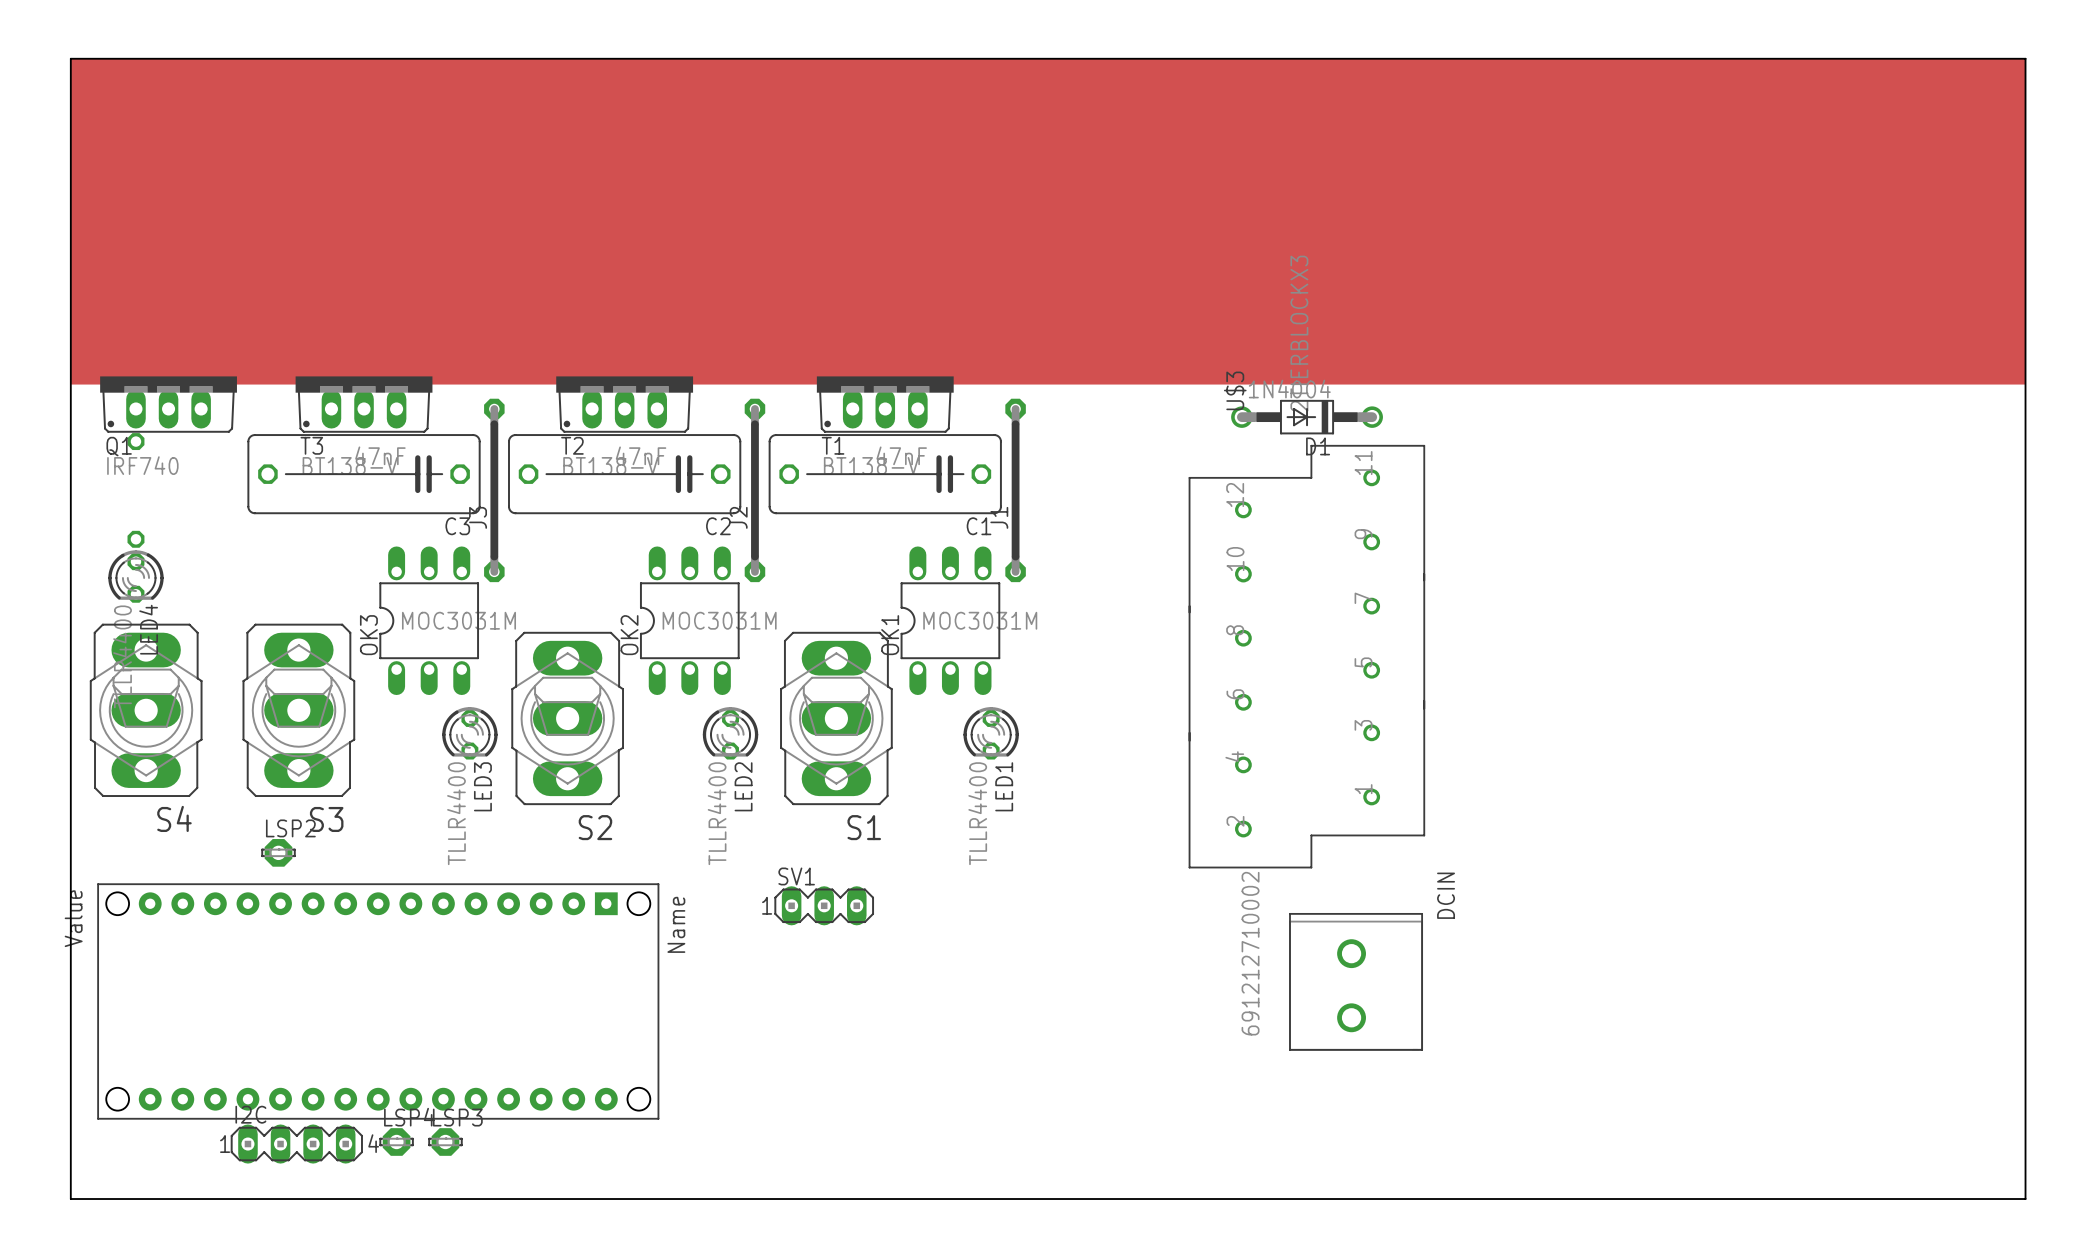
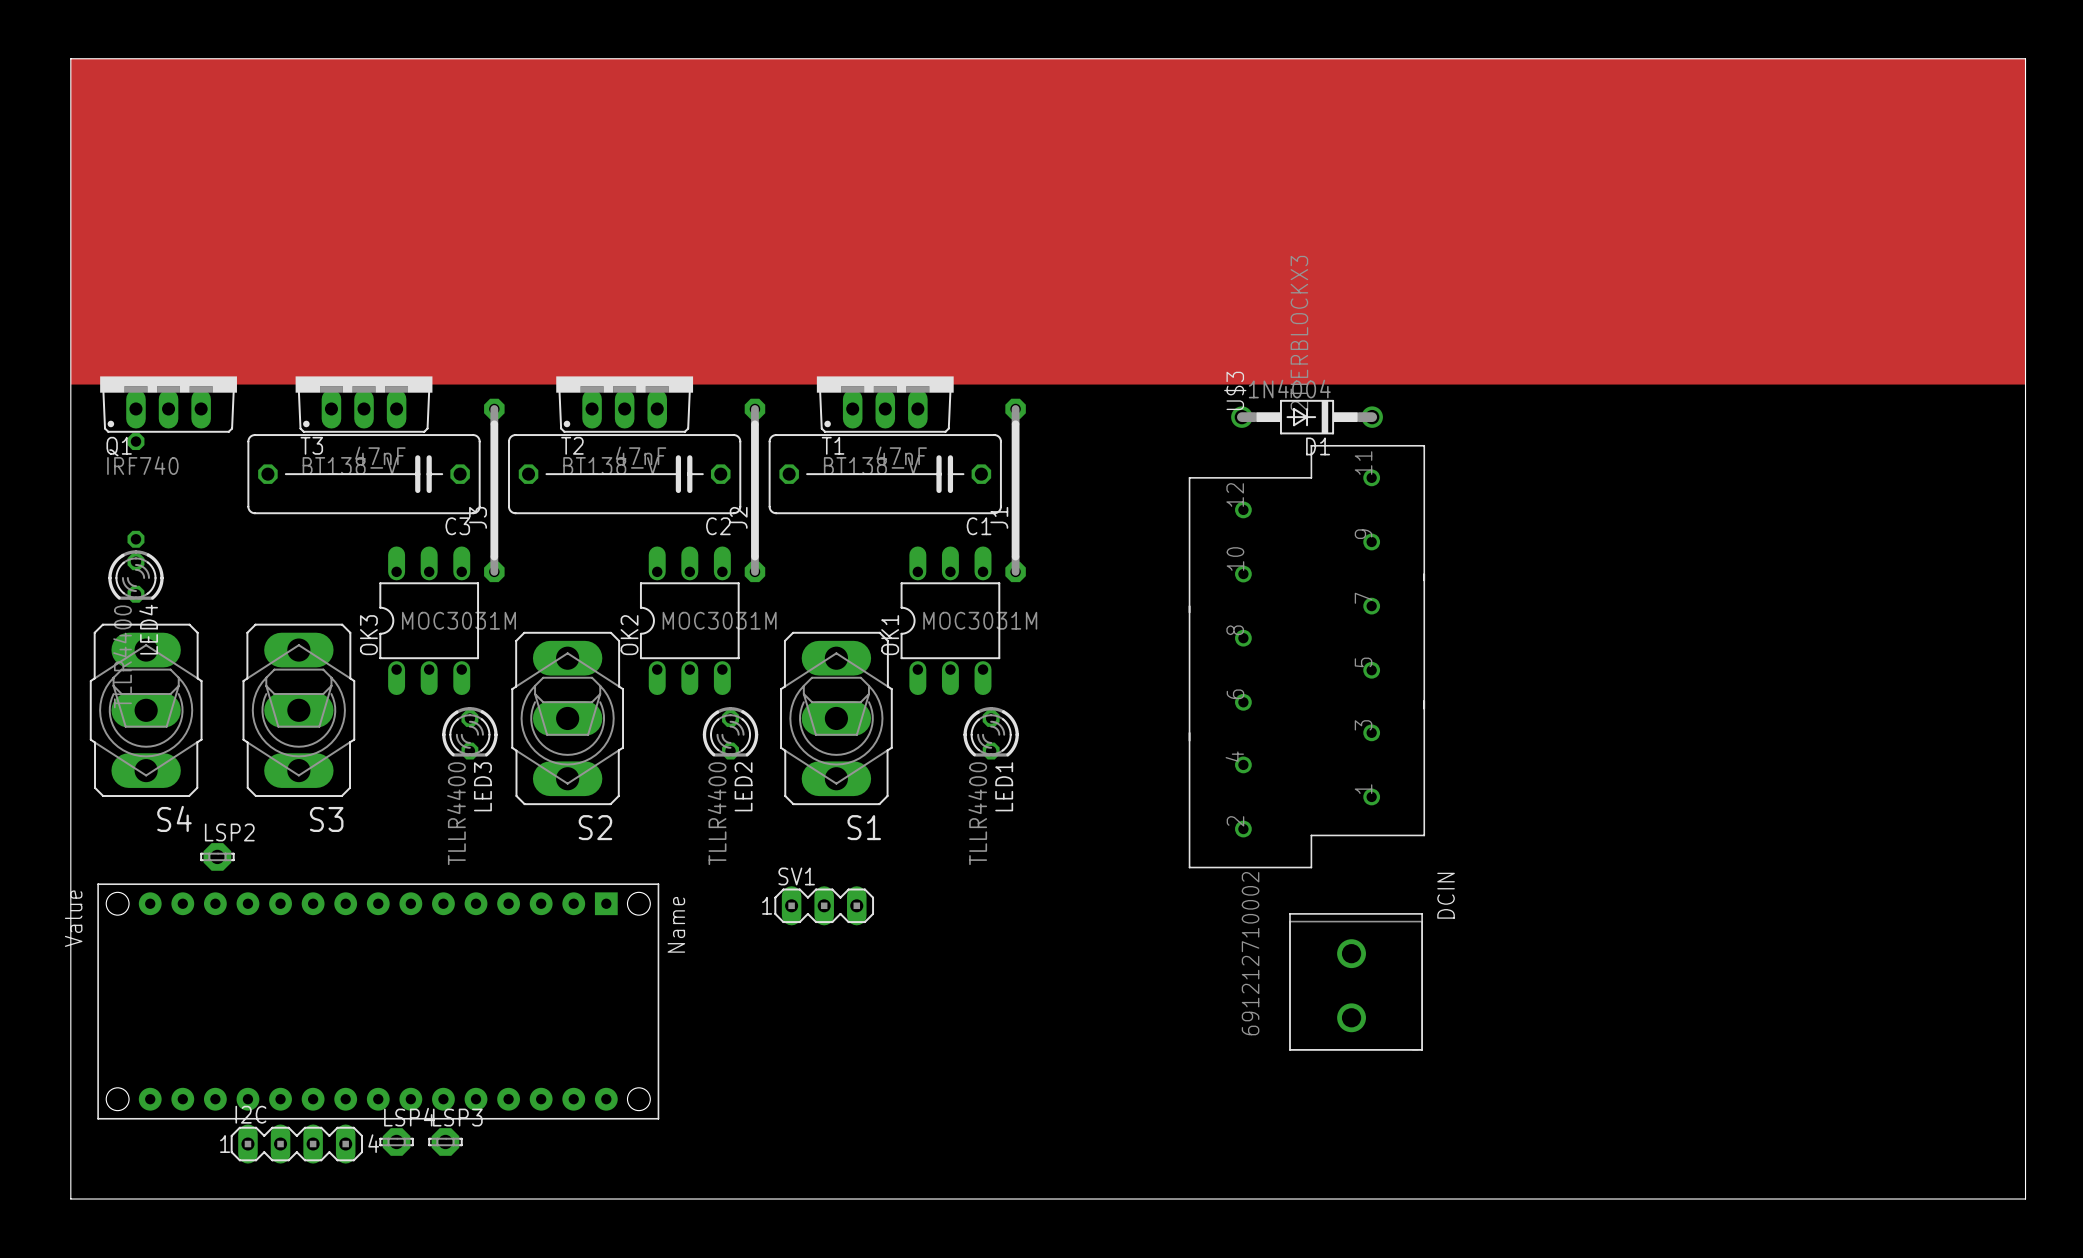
LSP2 position: (278, 852) -> (217, 856)

